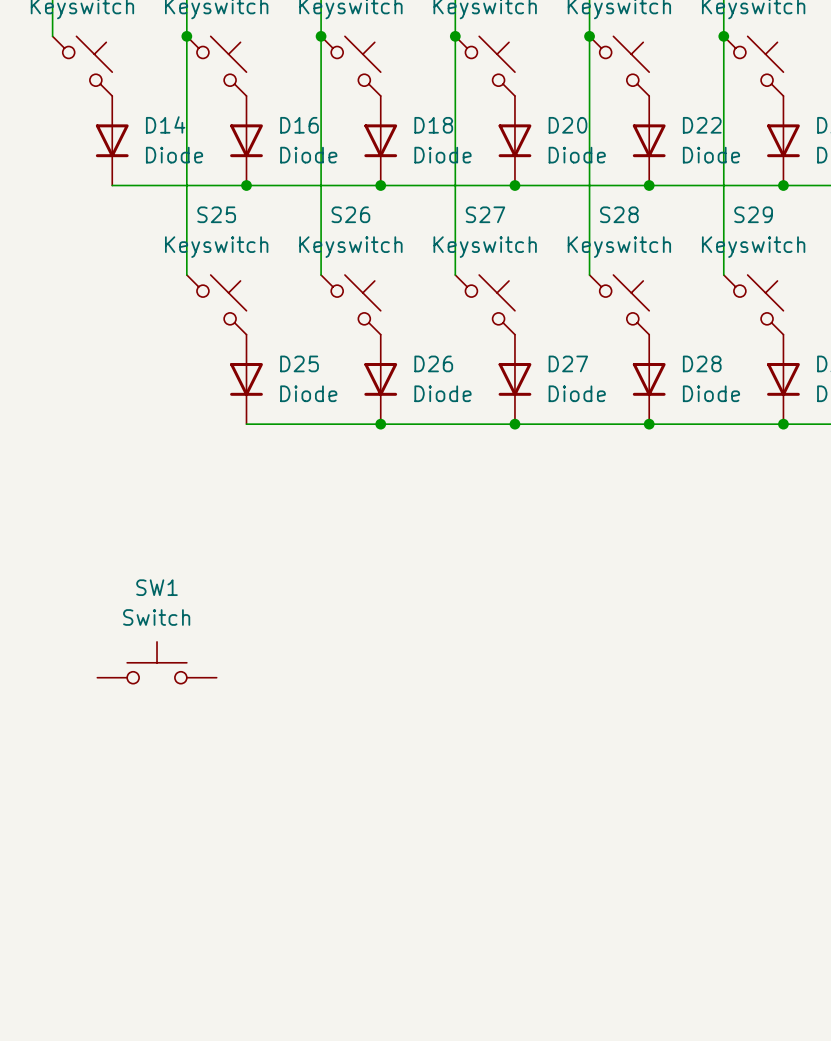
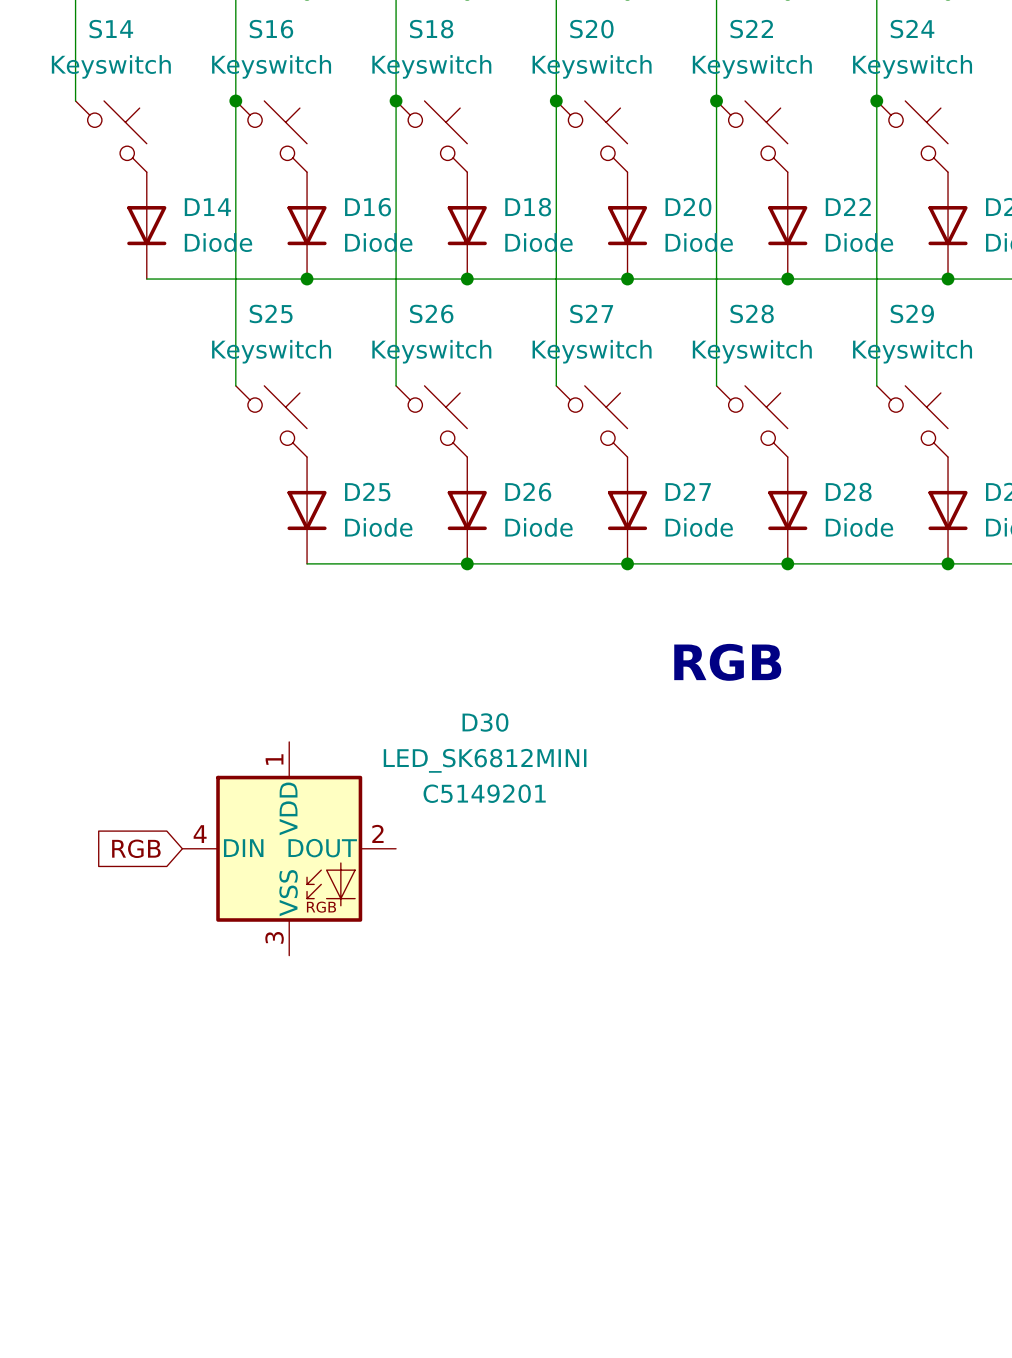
text: none -> RGB (727, 662)
global label: none -> RGB (136, 848)
SW1: Switch (157, 662) -> none
D30: none -> LED_SK6812MINI (289, 848)

